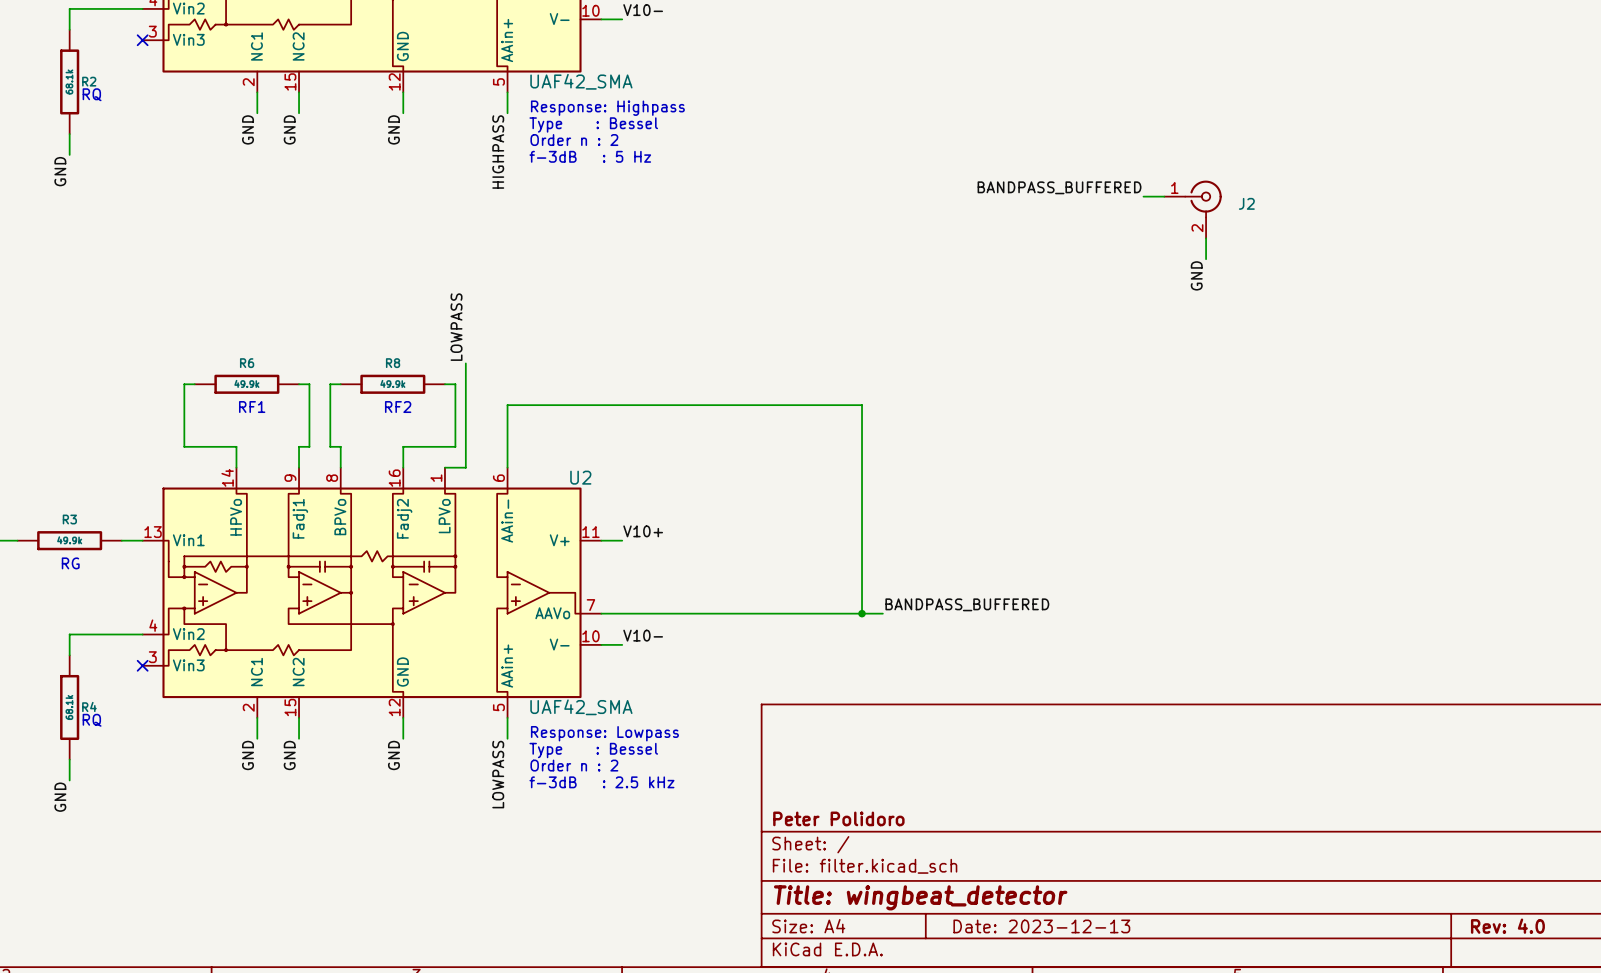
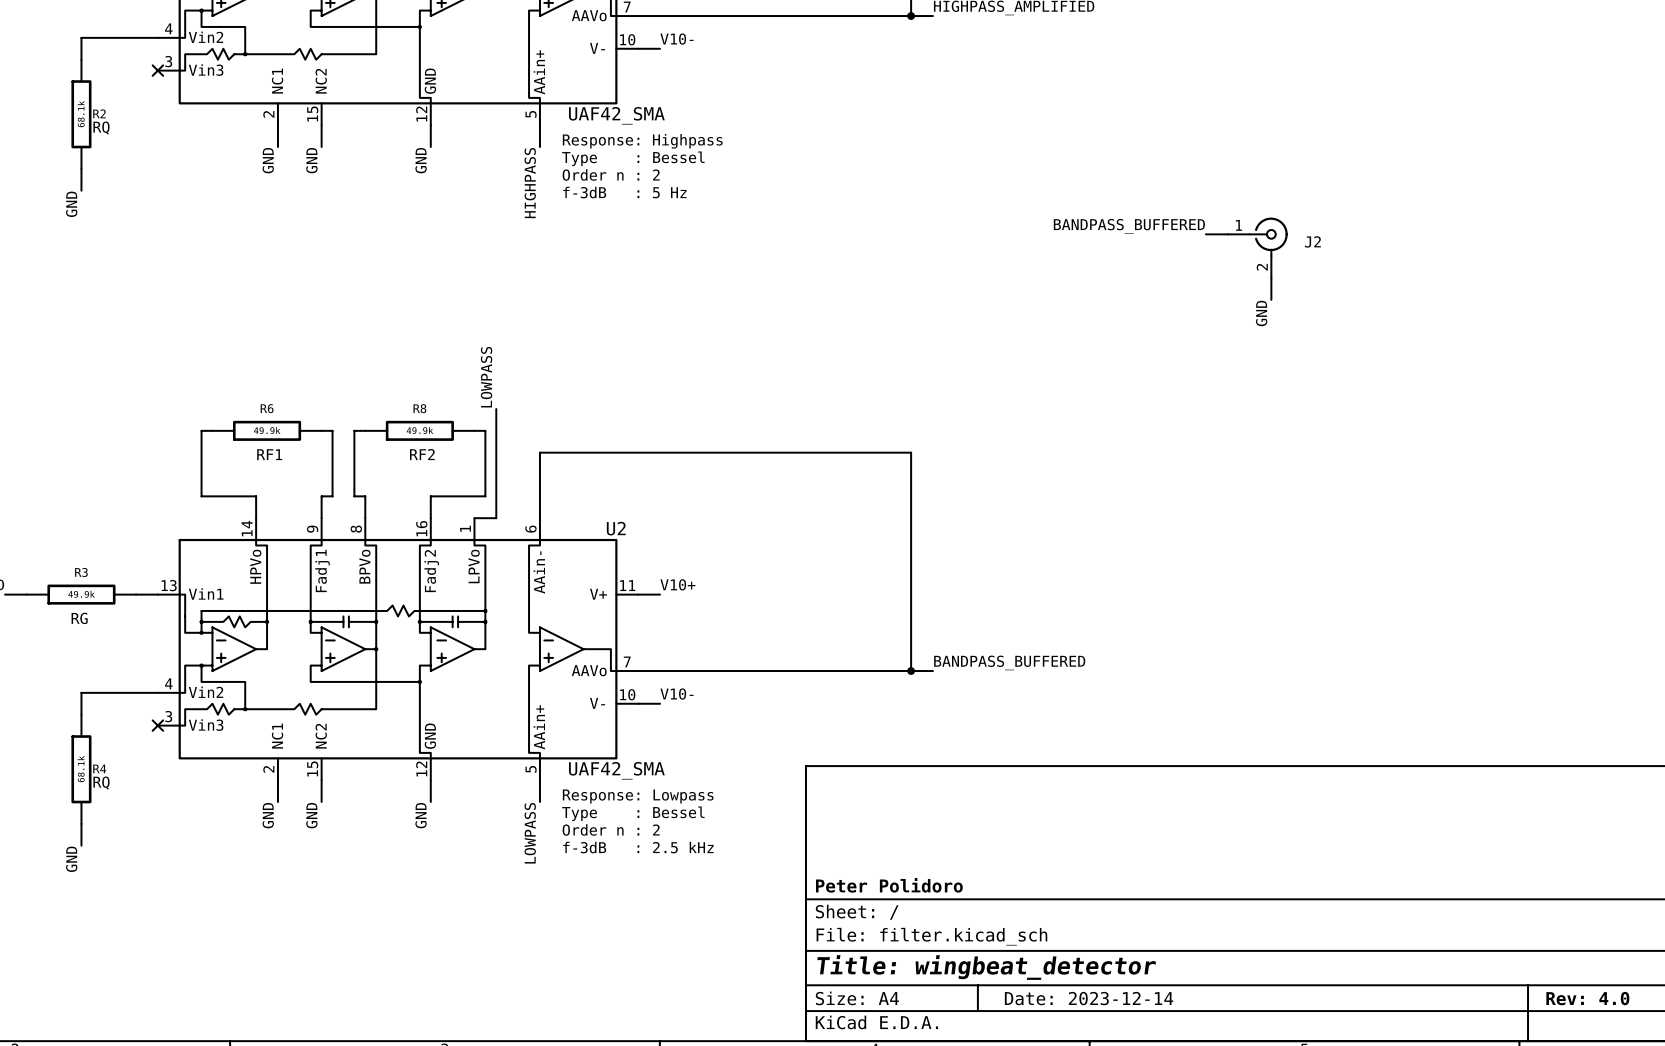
title block: Date: 2023-12-13 (1041, 926) -> Date: 2023-12-14 (1089, 998)

